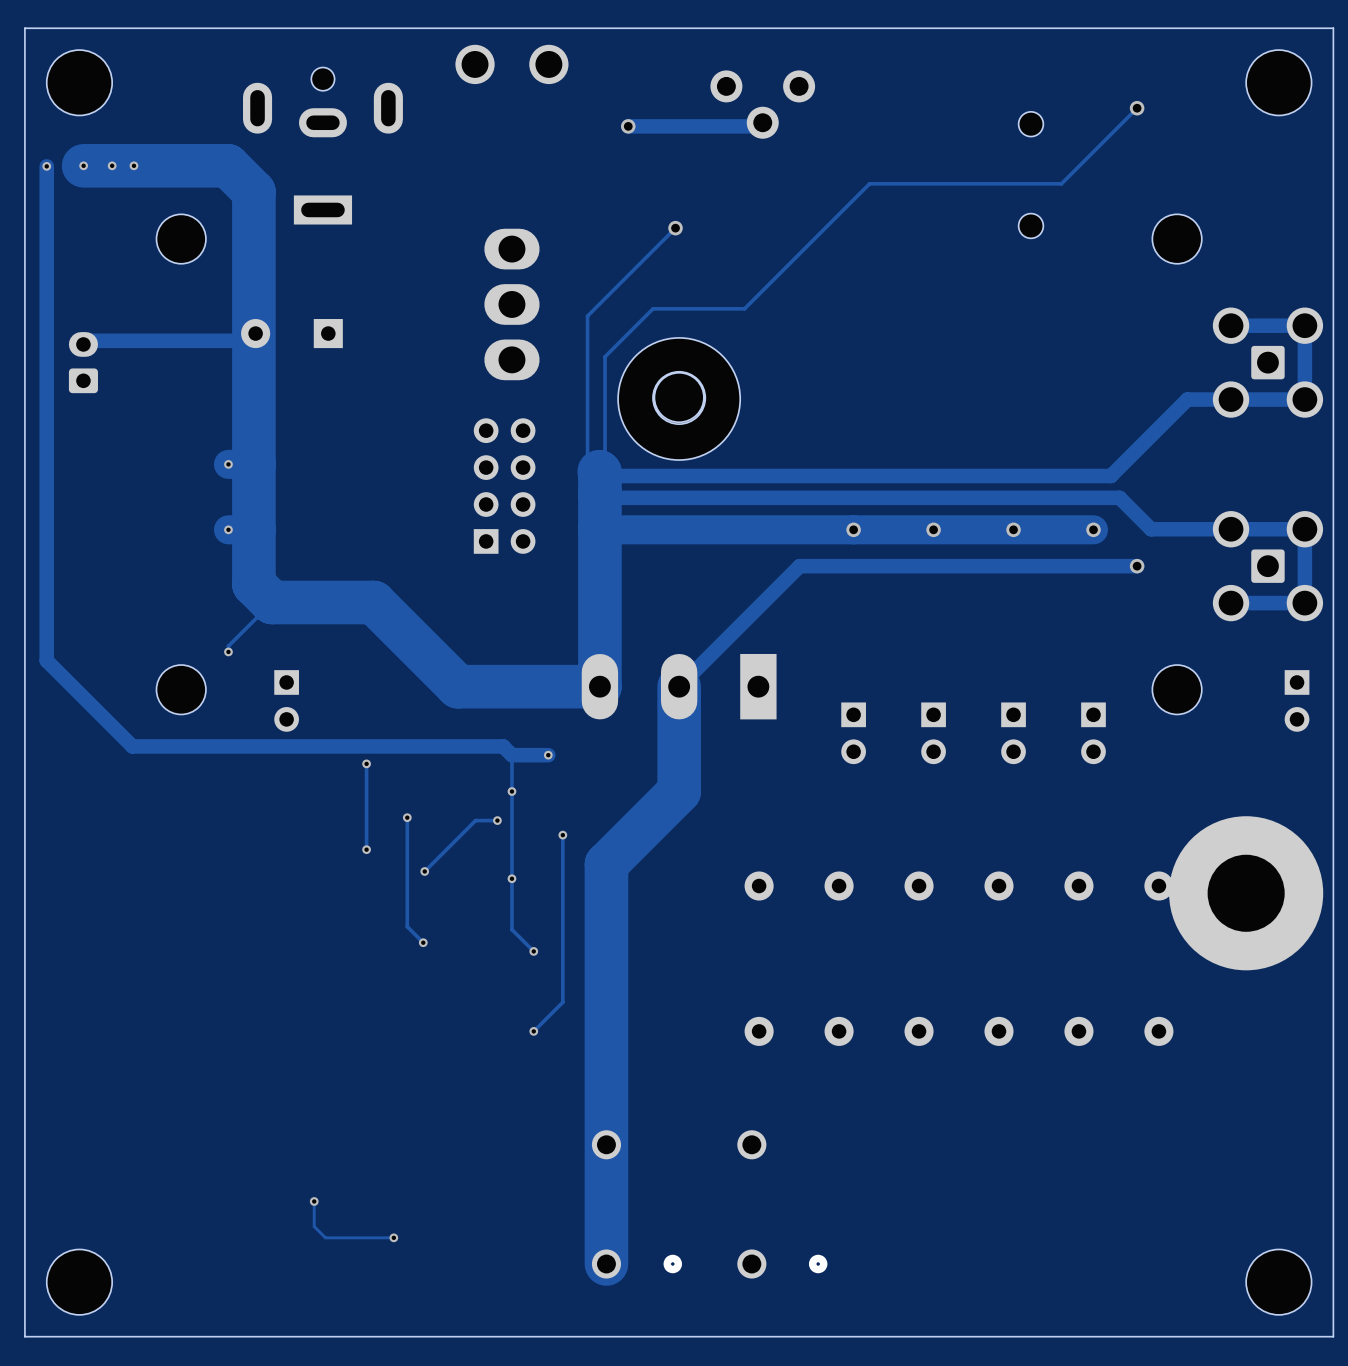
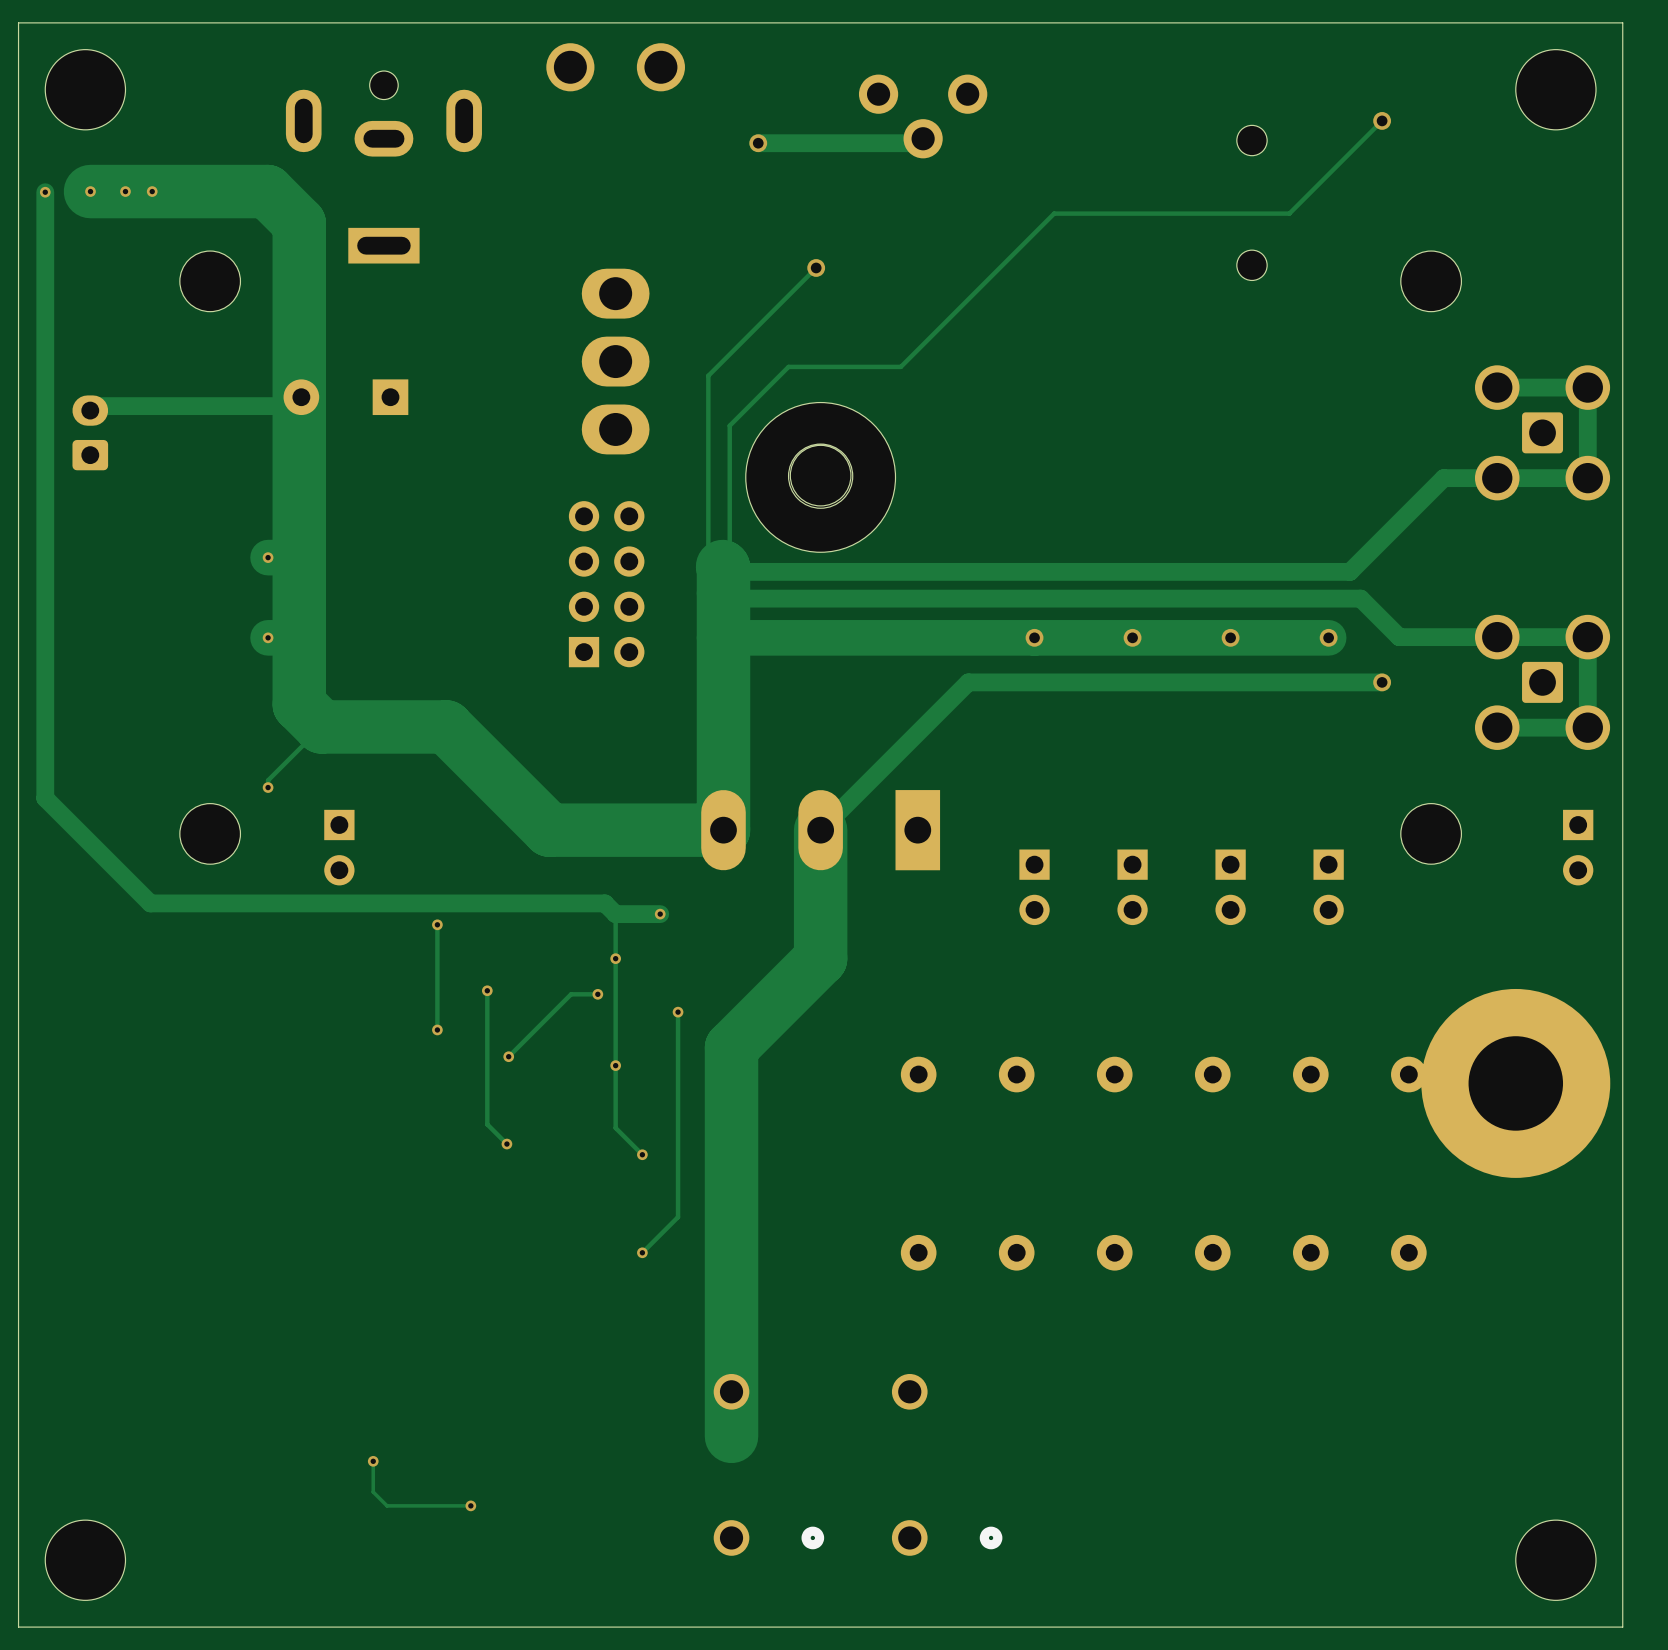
track: (606, 1181) (606, 1264) -> none

